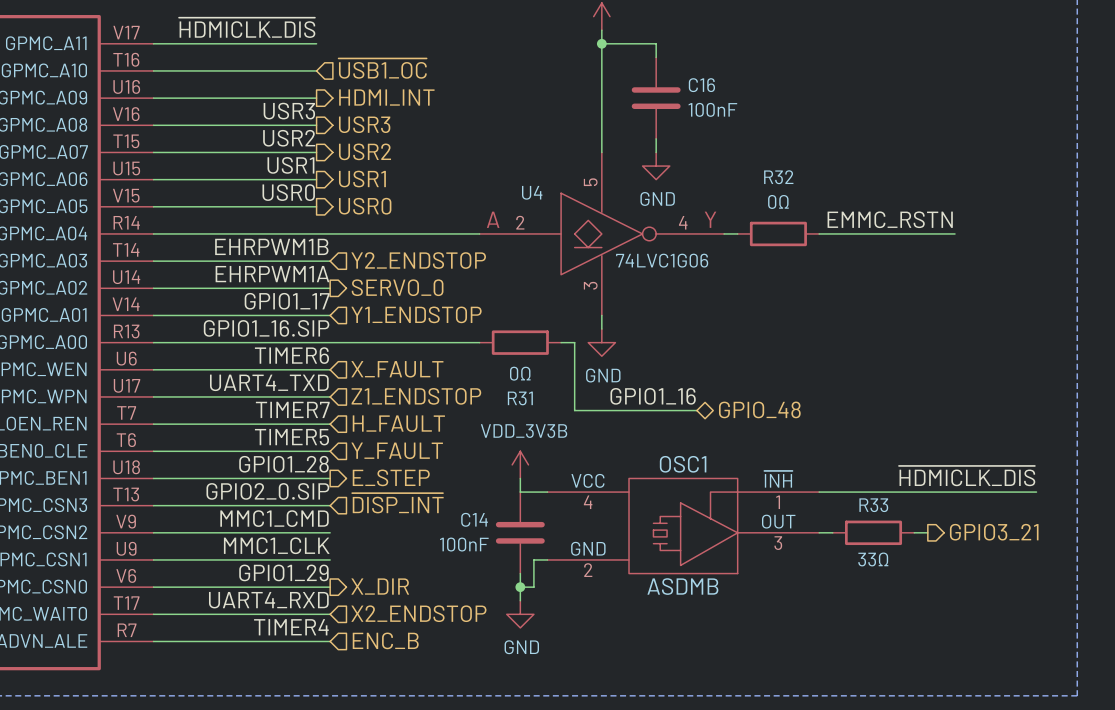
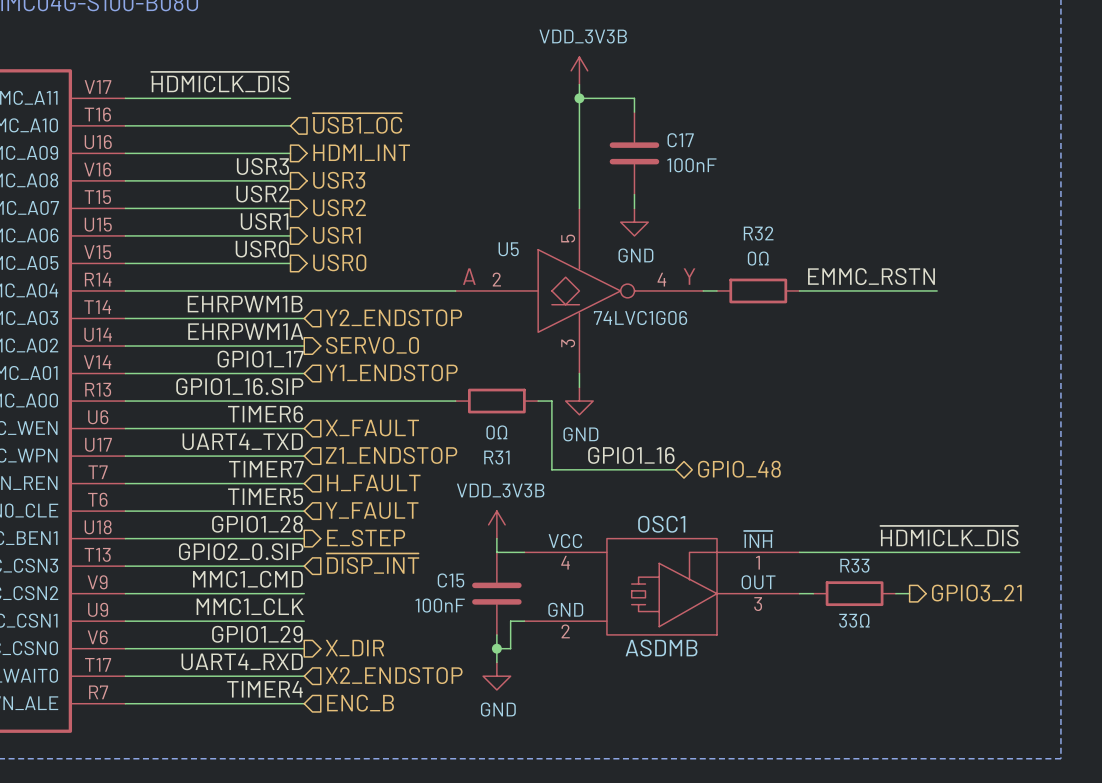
C16 name: C16 (701, 85) -> C17 (680, 140)
U4 name: U4 (532, 192) -> U5 (508, 249)
C14 name: C14 (474, 519) -> C15 (450, 580)

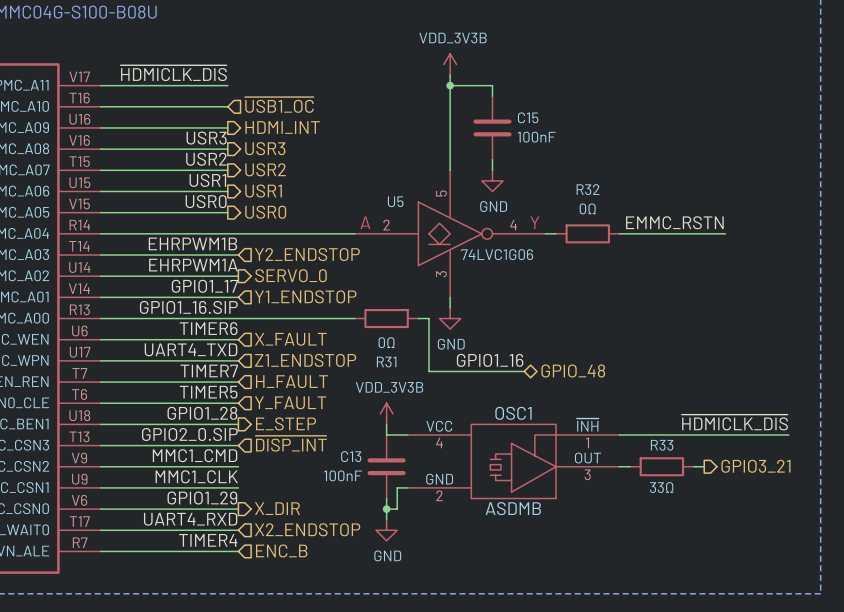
C17 name: C17 (680, 140) -> C15 (528, 117)
C15 name: C15 (450, 580) -> C13 (351, 456)

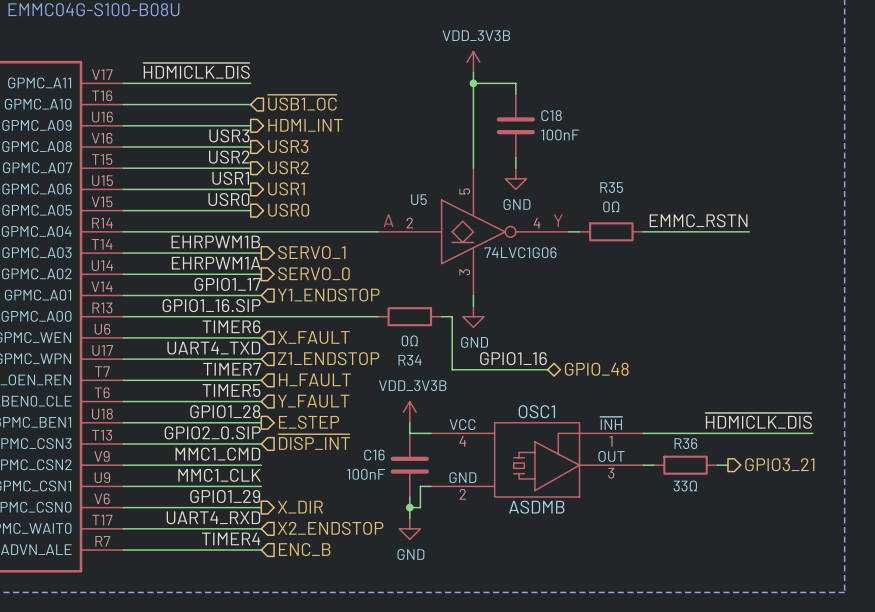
C15 name: C15 (528, 117) -> C18 (551, 115)
R32 name: R32 (588, 189) -> R35 (611, 187)
hierarchical label shape: input (307, 254) -> output (311, 252)
hierarchical label: Y2_ENDSTOP (307, 254) -> SERVO_1 (311, 252)
R31 name: R31 (386, 362) -> R34 (410, 360)
R33 name: R33 (662, 445) -> R36 (685, 443)
C13 name: C13 (351, 456) -> C16 (374, 455)

